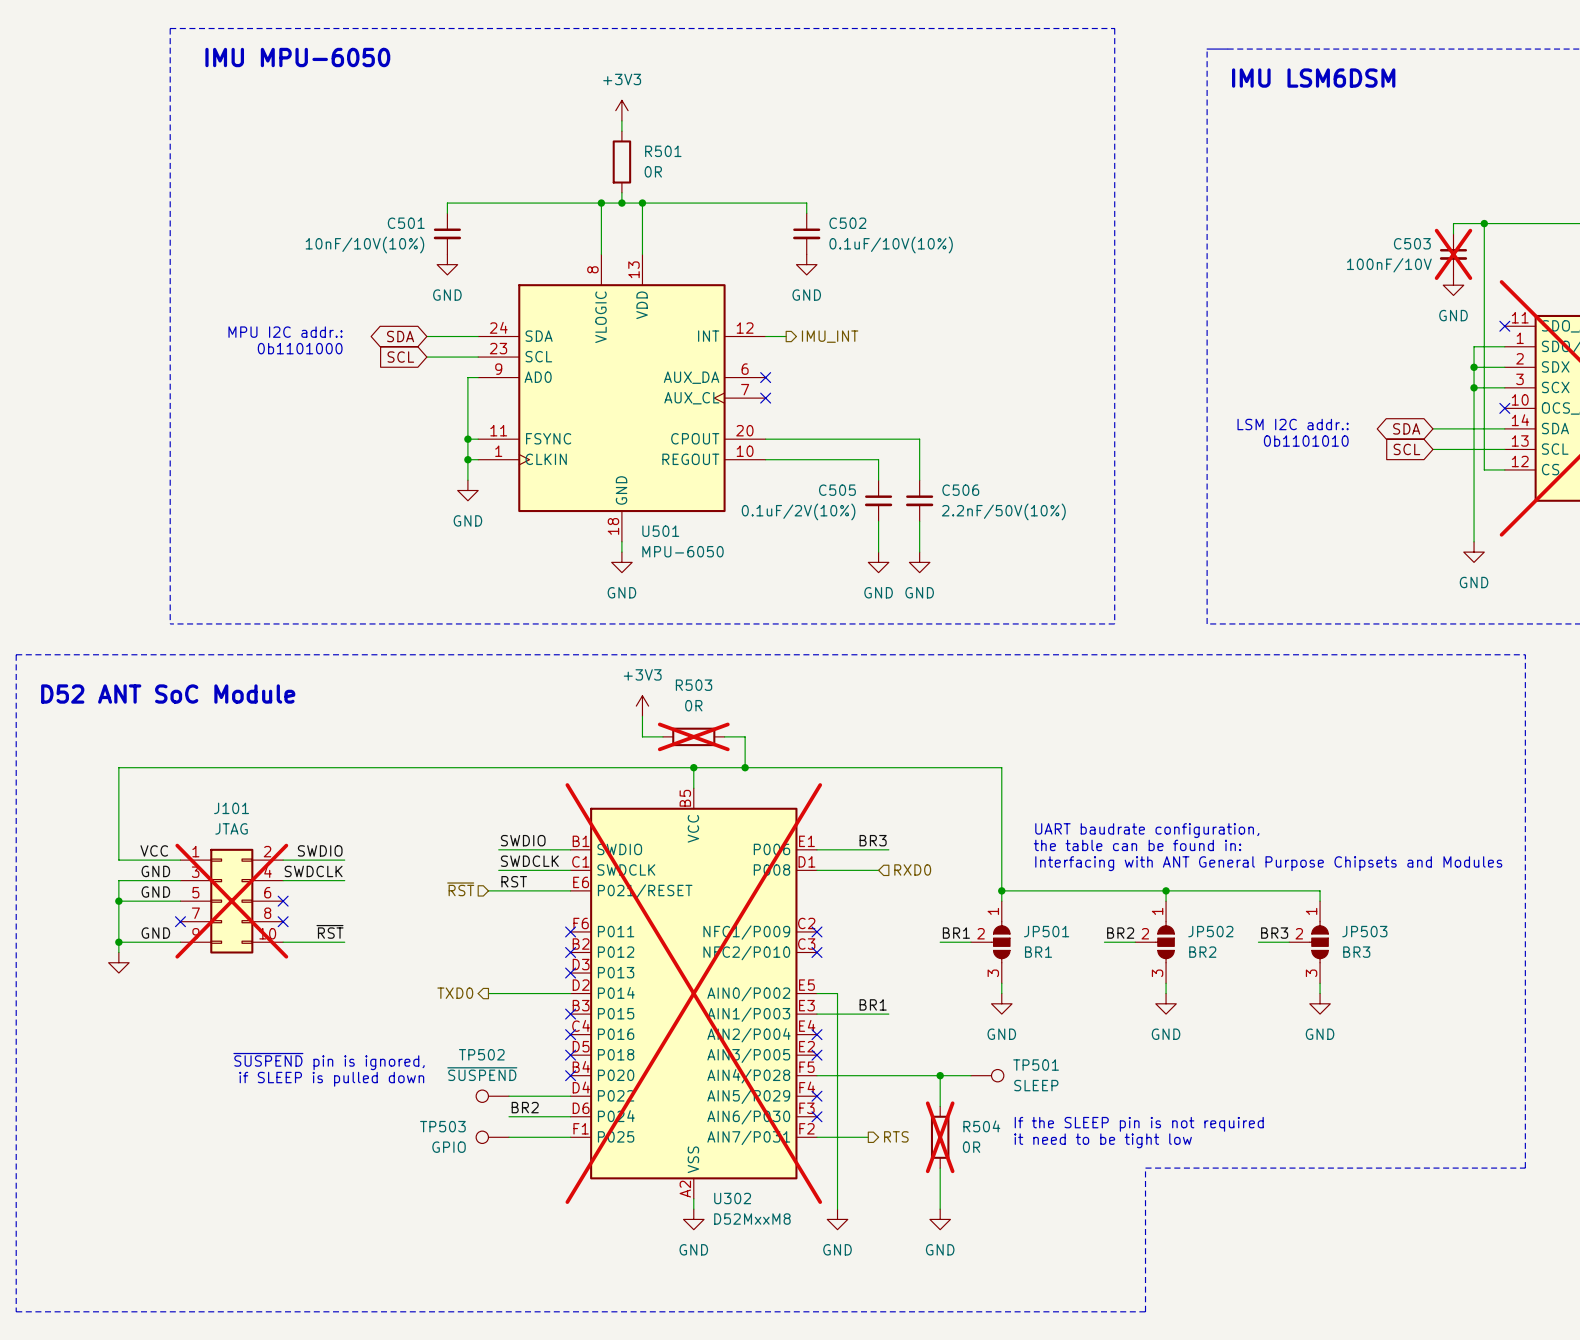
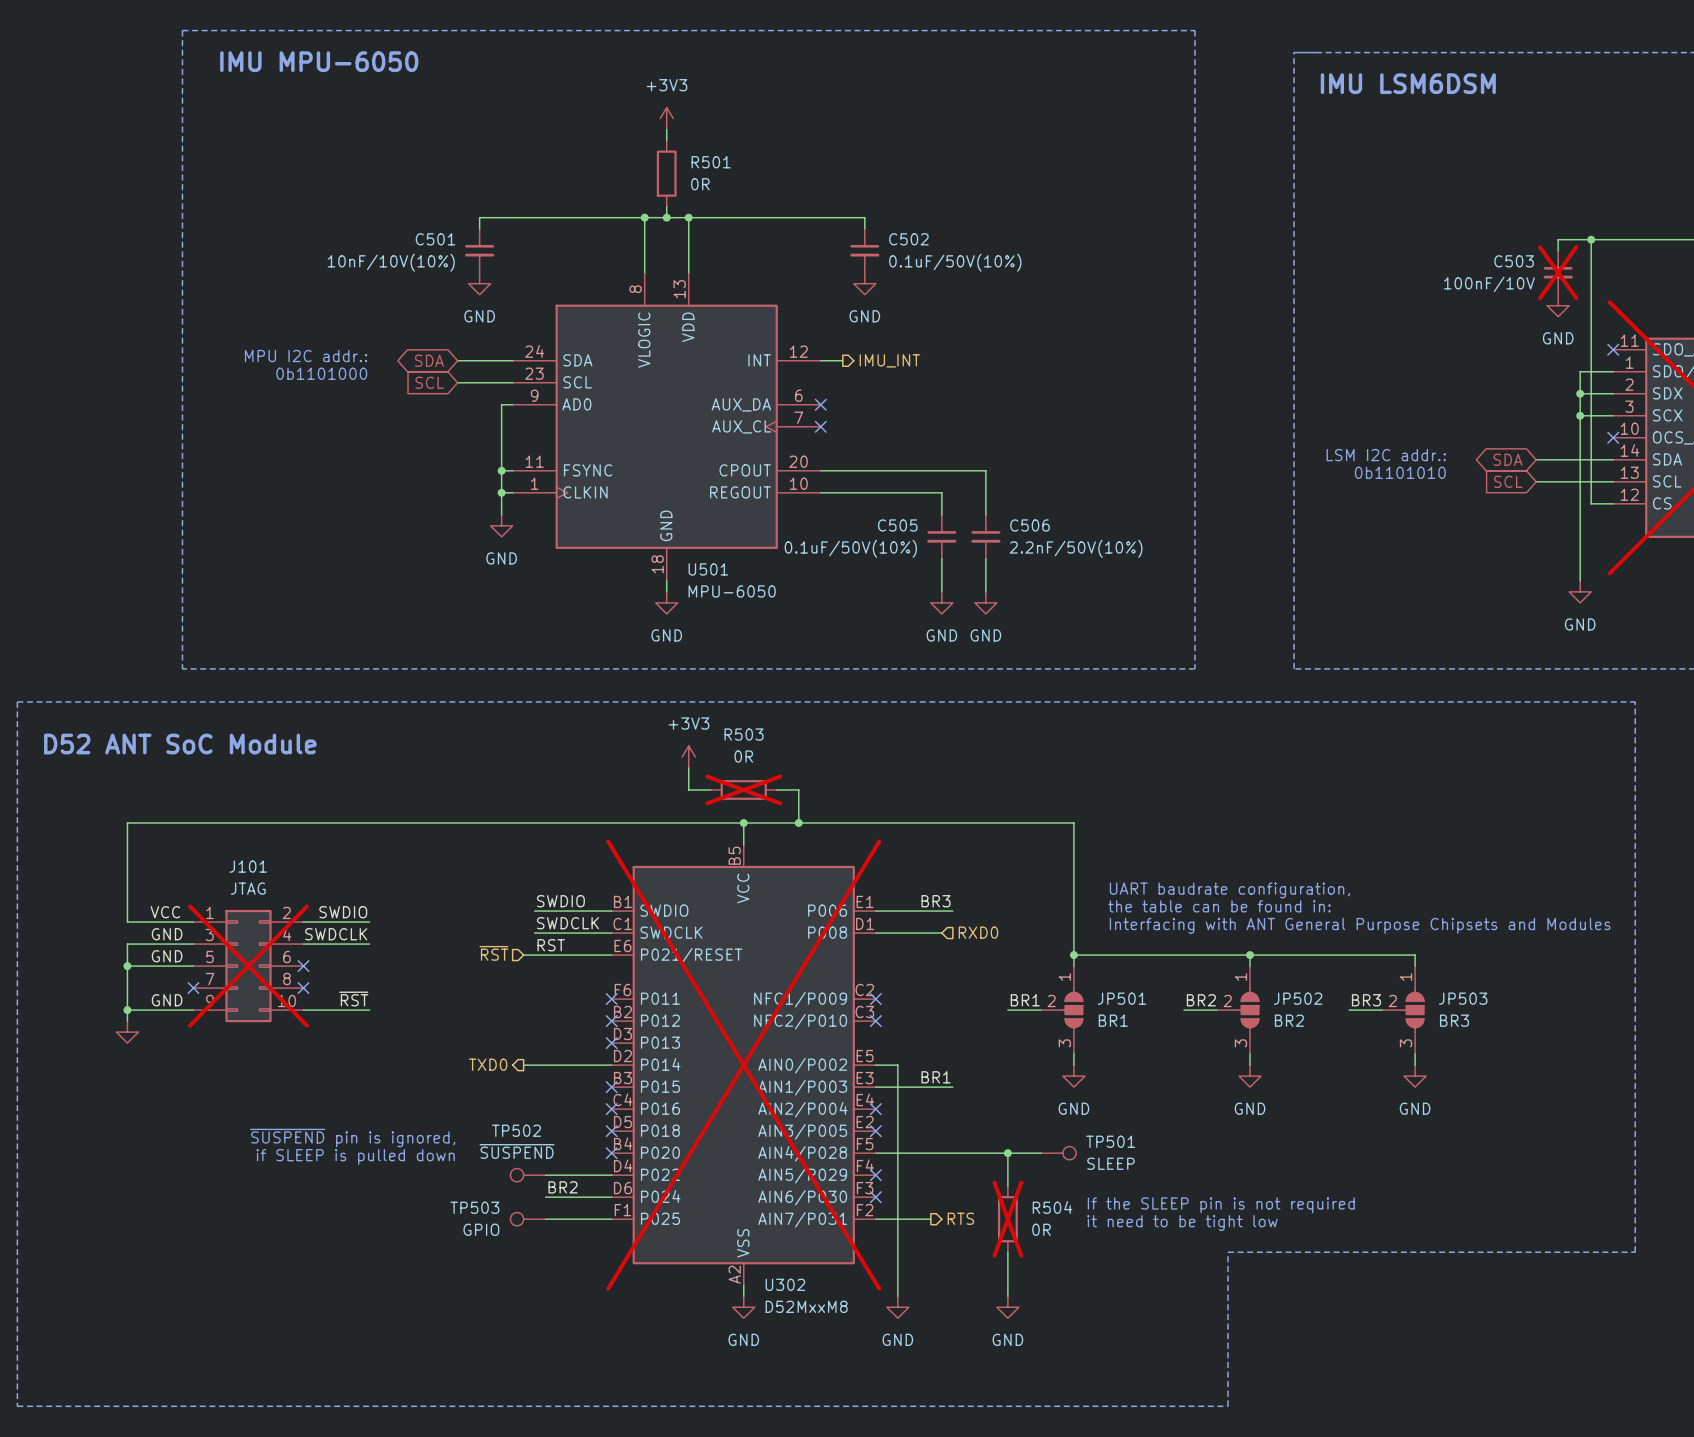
C502 value: 0.1uF/10V(10%) (891, 245) -> 0.1uF/50V(10%) (955, 262)
C505 value: 0.1uF/2V(10%) (798, 511) -> 0.1uF/50V(10%) (850, 548)

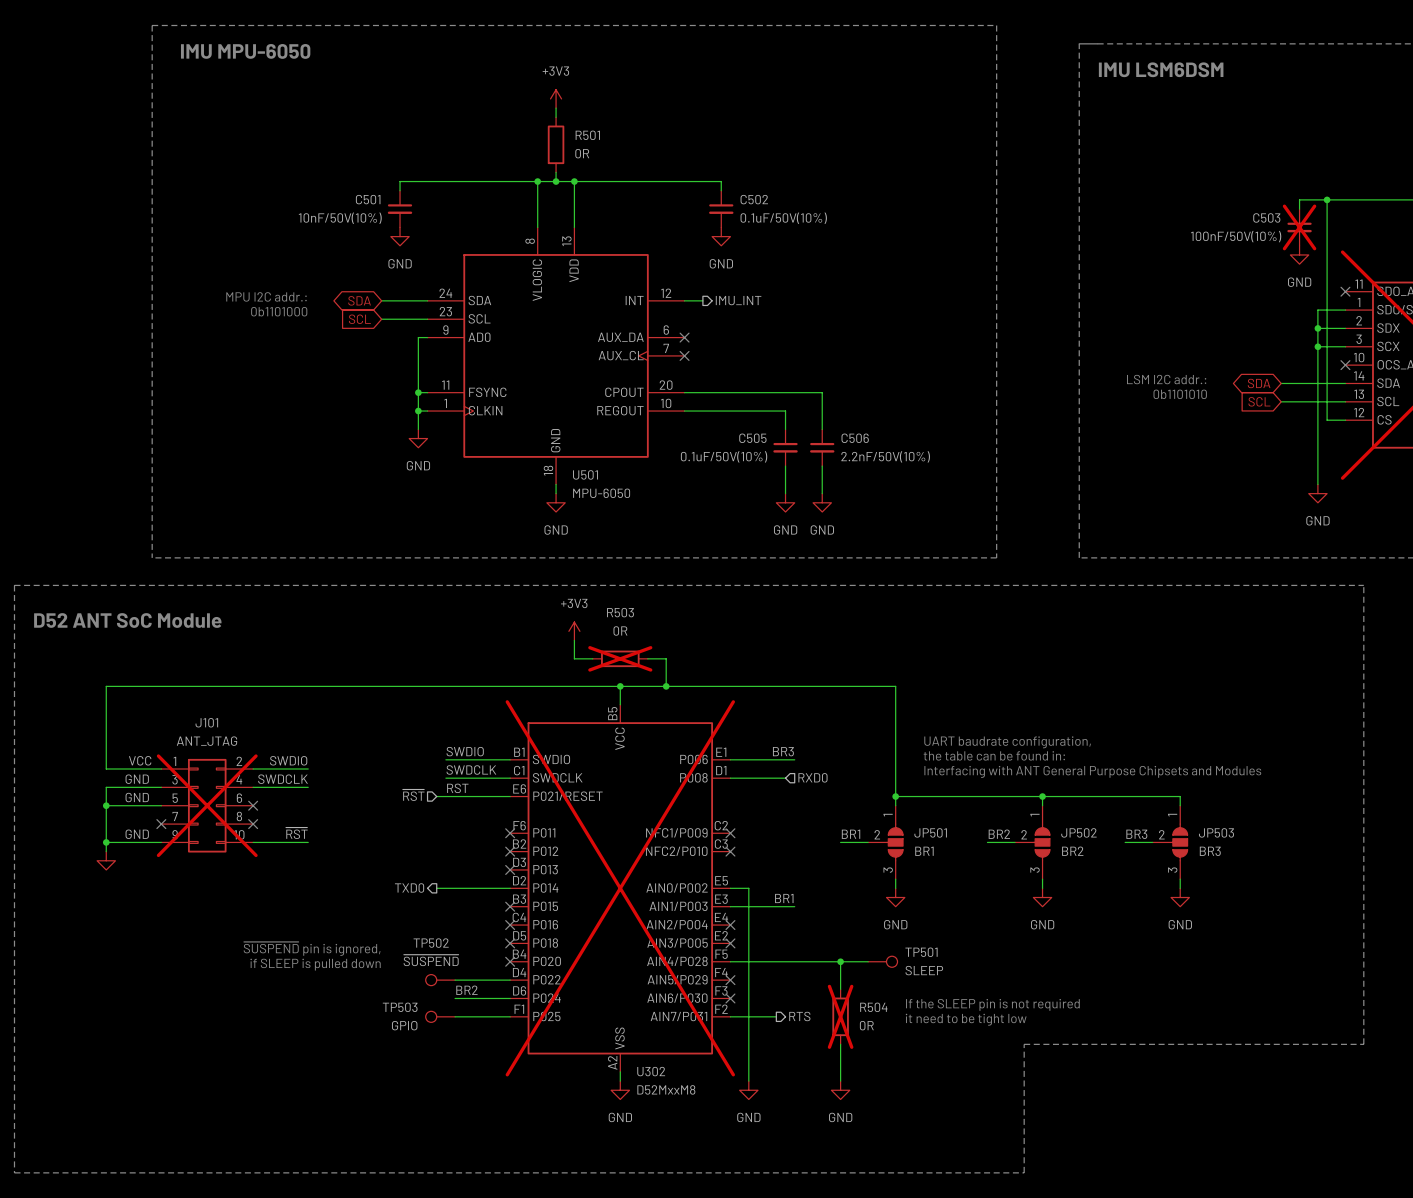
C501 value: 10nF/10V(10%) (391, 262) -> 10nF/50V(10%) (340, 218)
C503 value: 100nF/10V (1489, 284) -> 100nF/50V(10%) (1236, 236)
J101 value: JTAG (248, 888) -> ANT_JTAG (206, 741)

